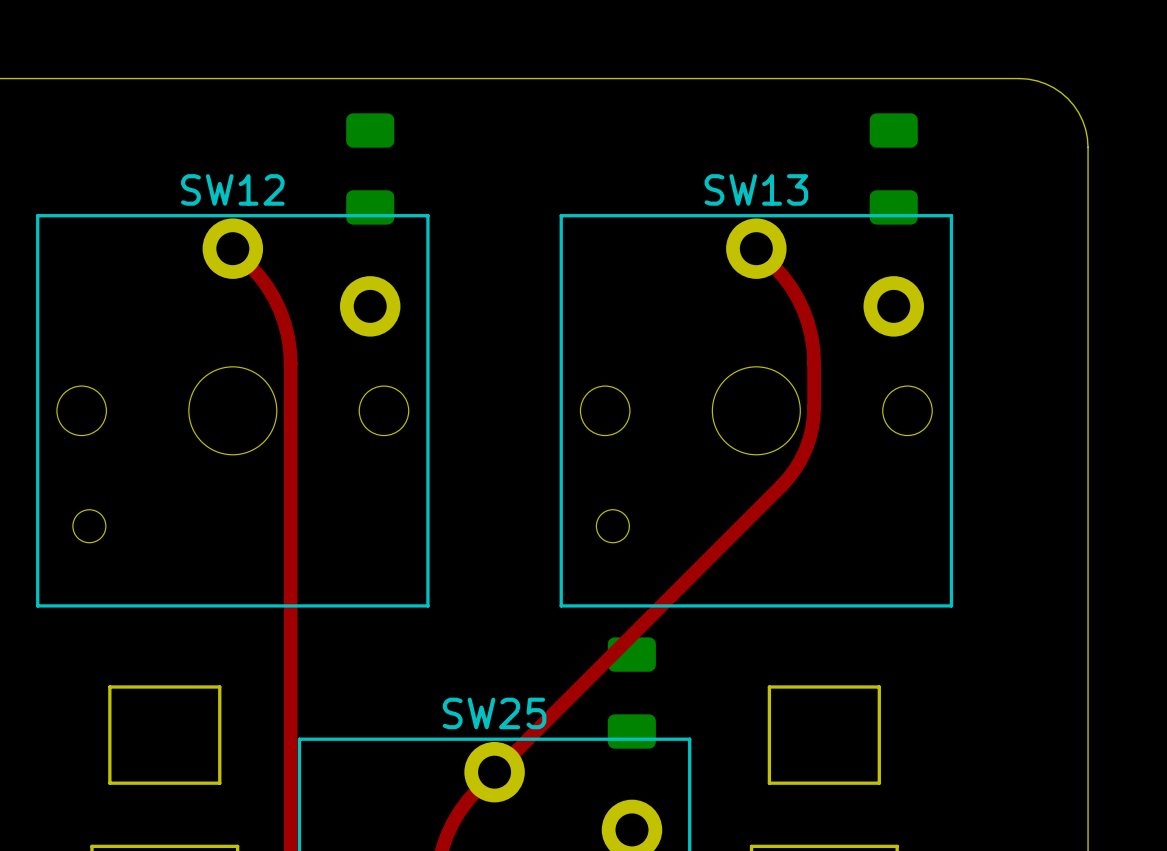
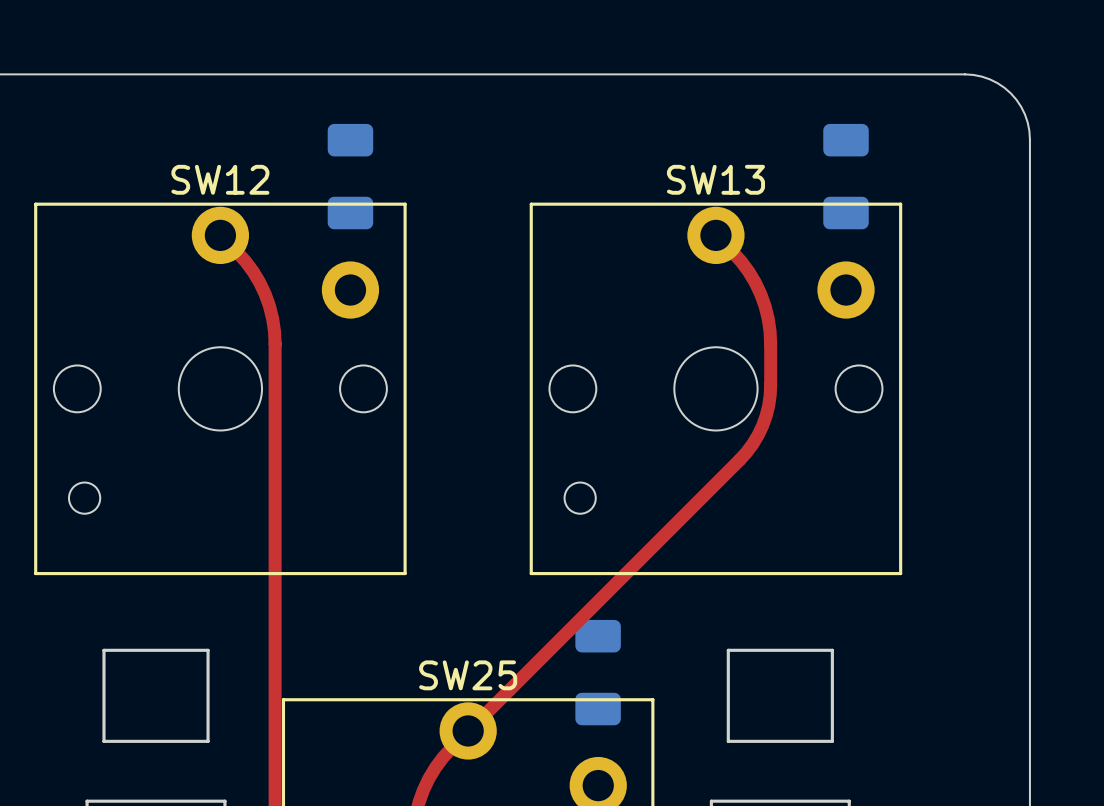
part position: (370, 168) -> (350, 176)
part position: (893, 168) -> (846, 176)
part position: (631, 693) -> (598, 672)

